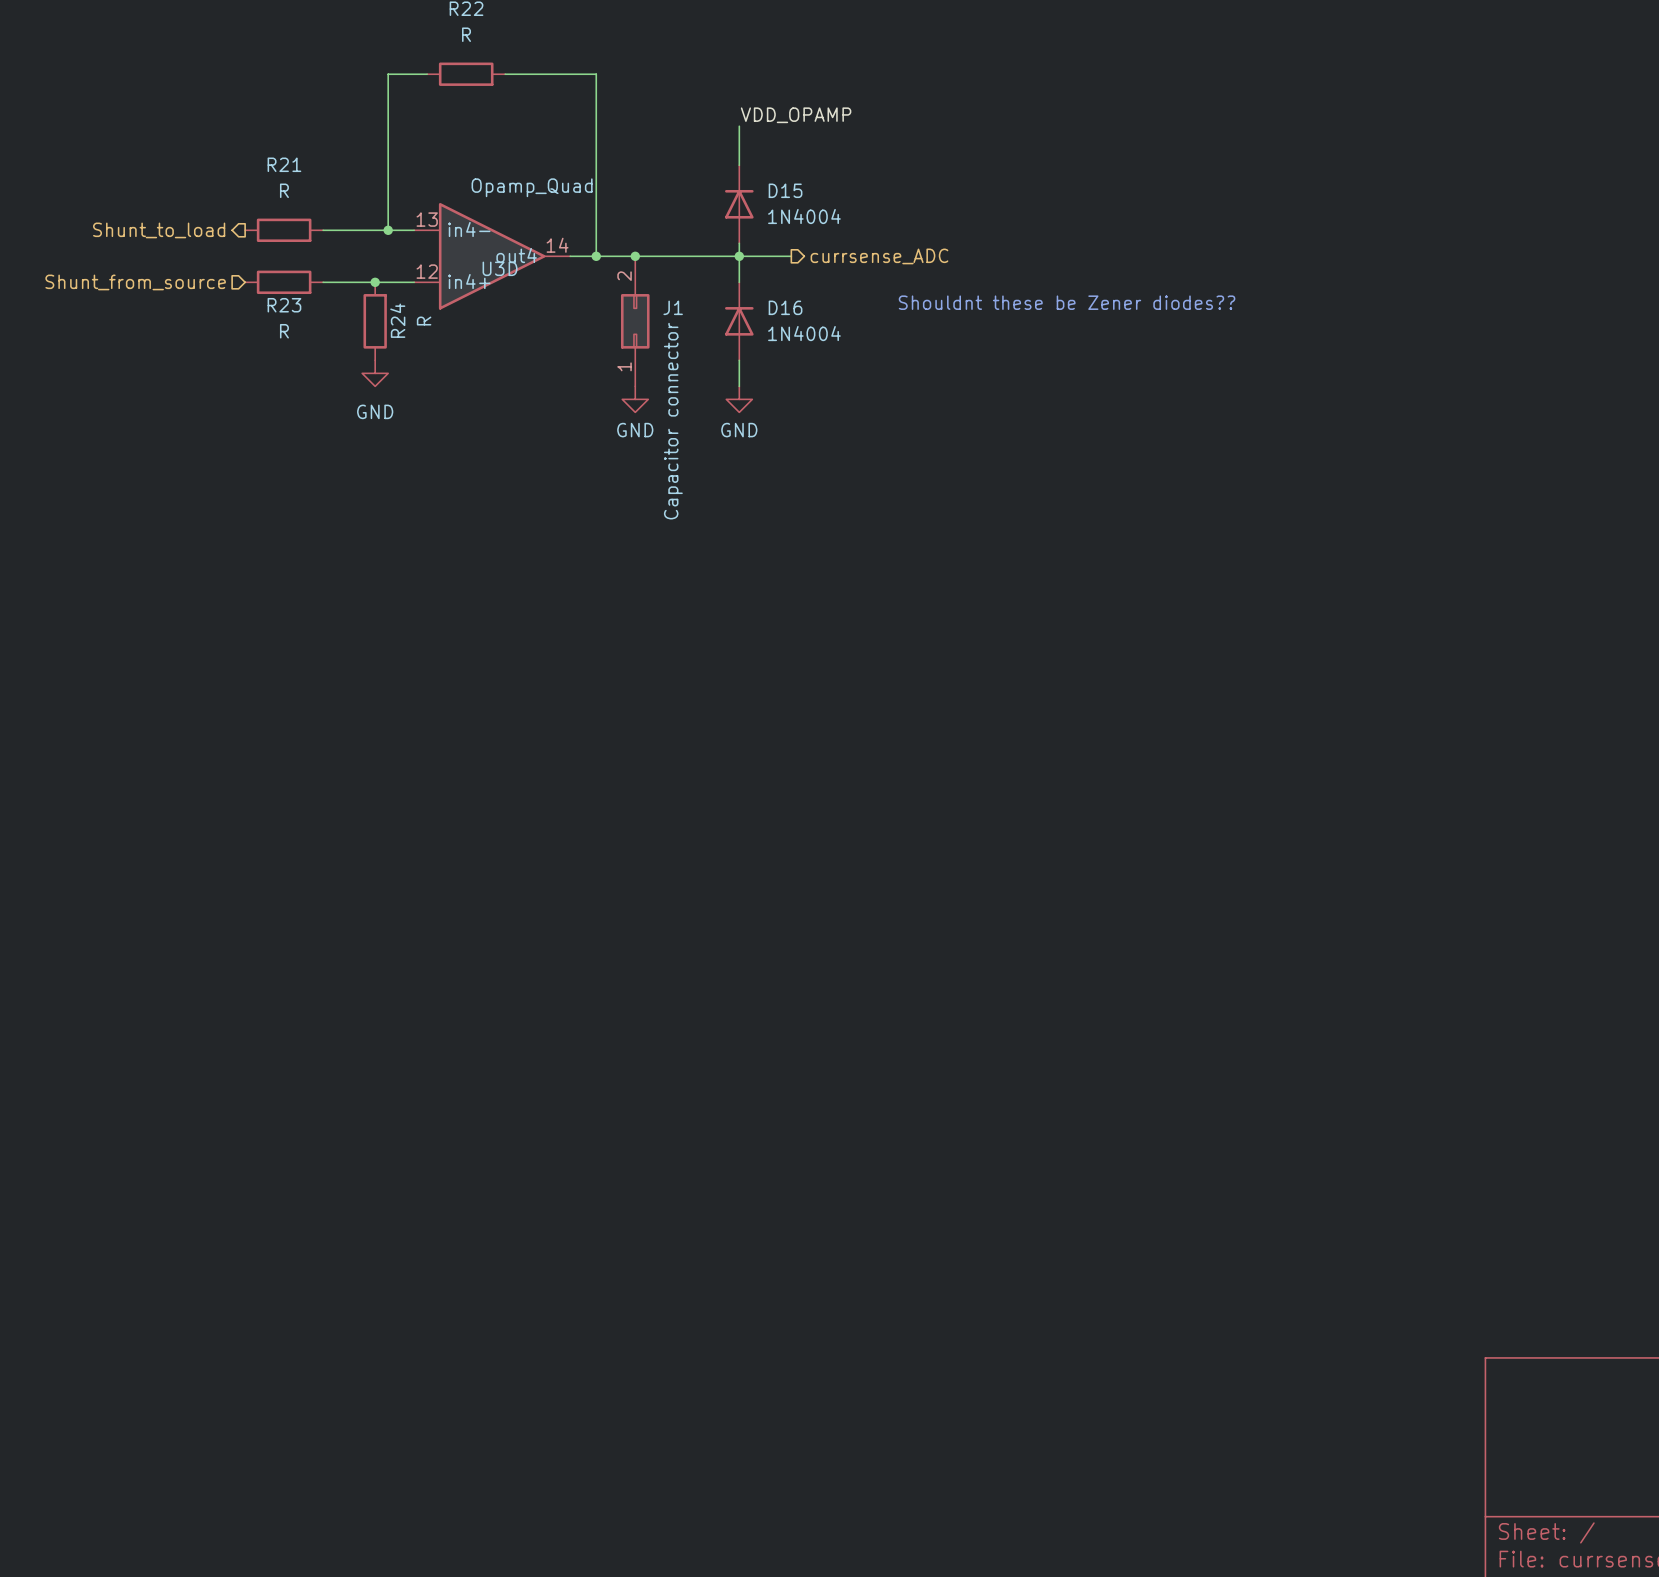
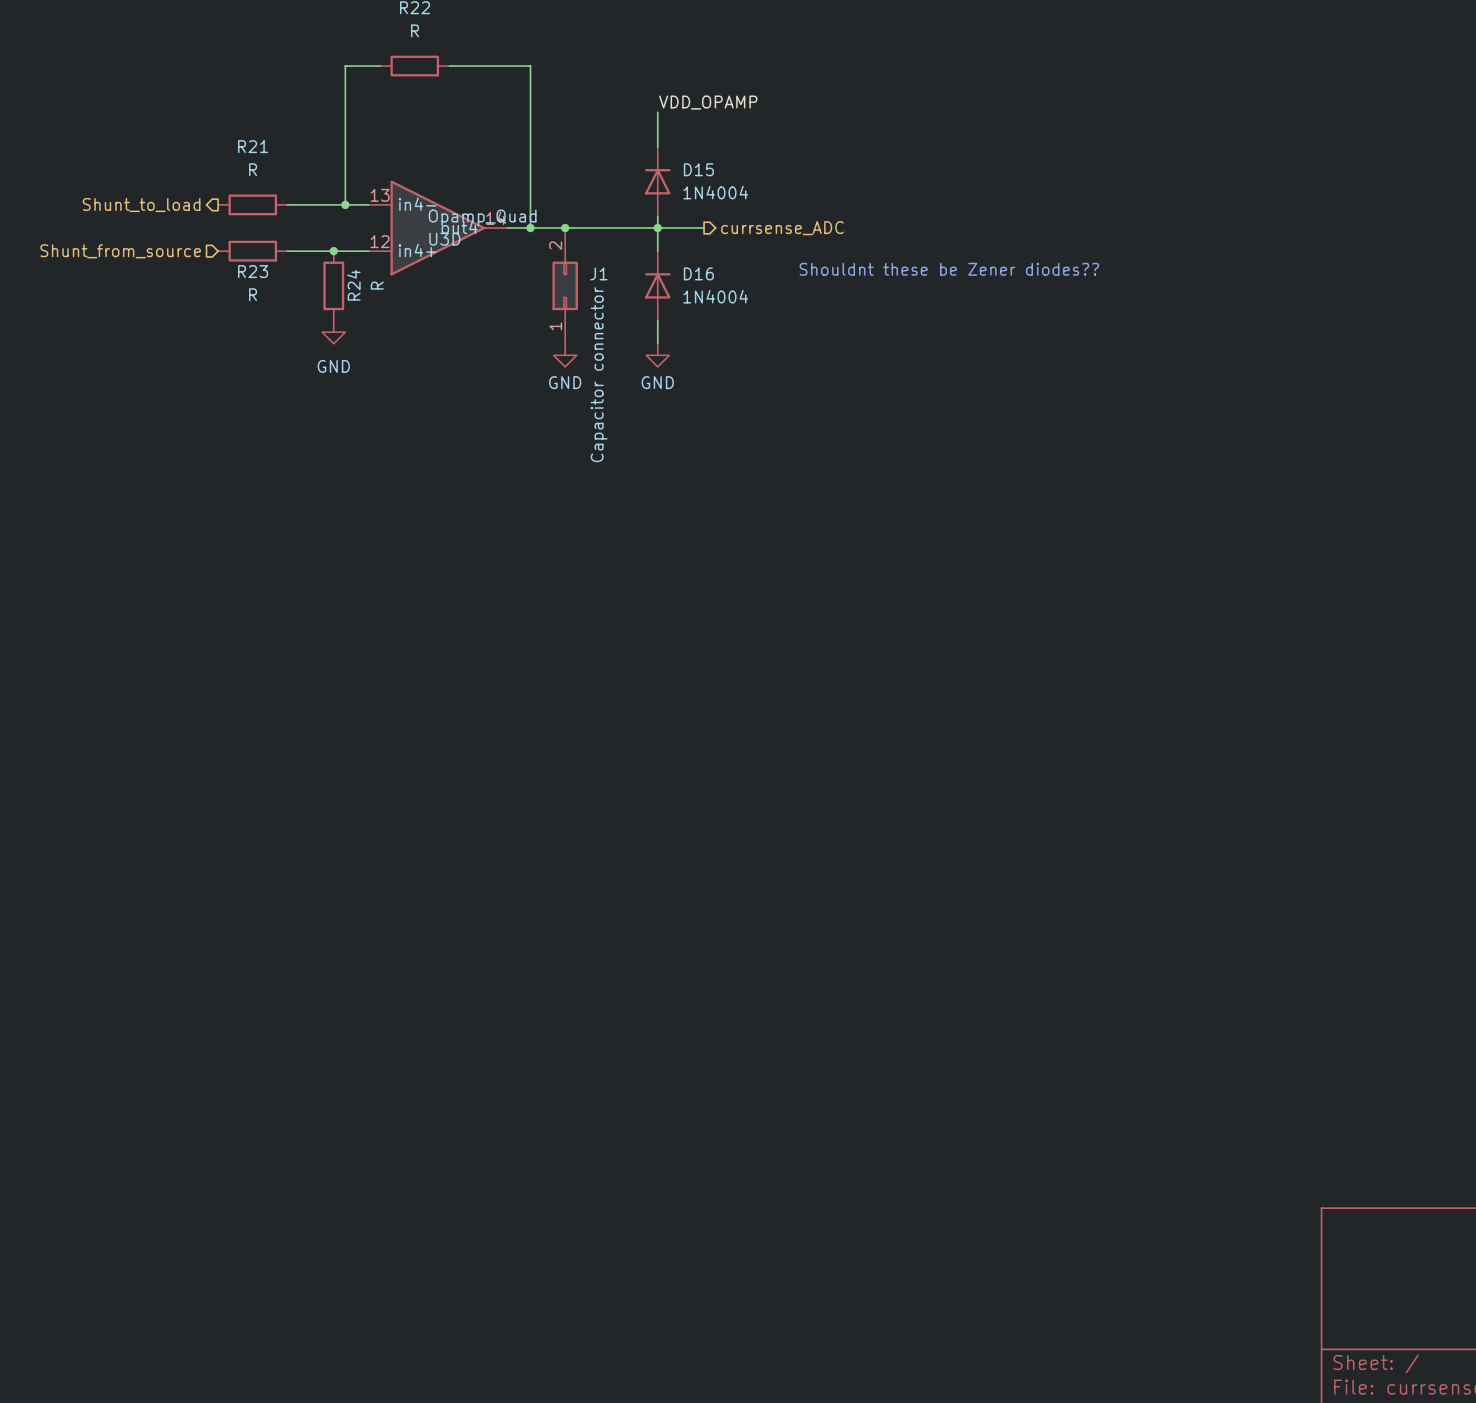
U3D value position: Opamp_Quad (532, 187) -> Opamp_Quad (482, 217)

